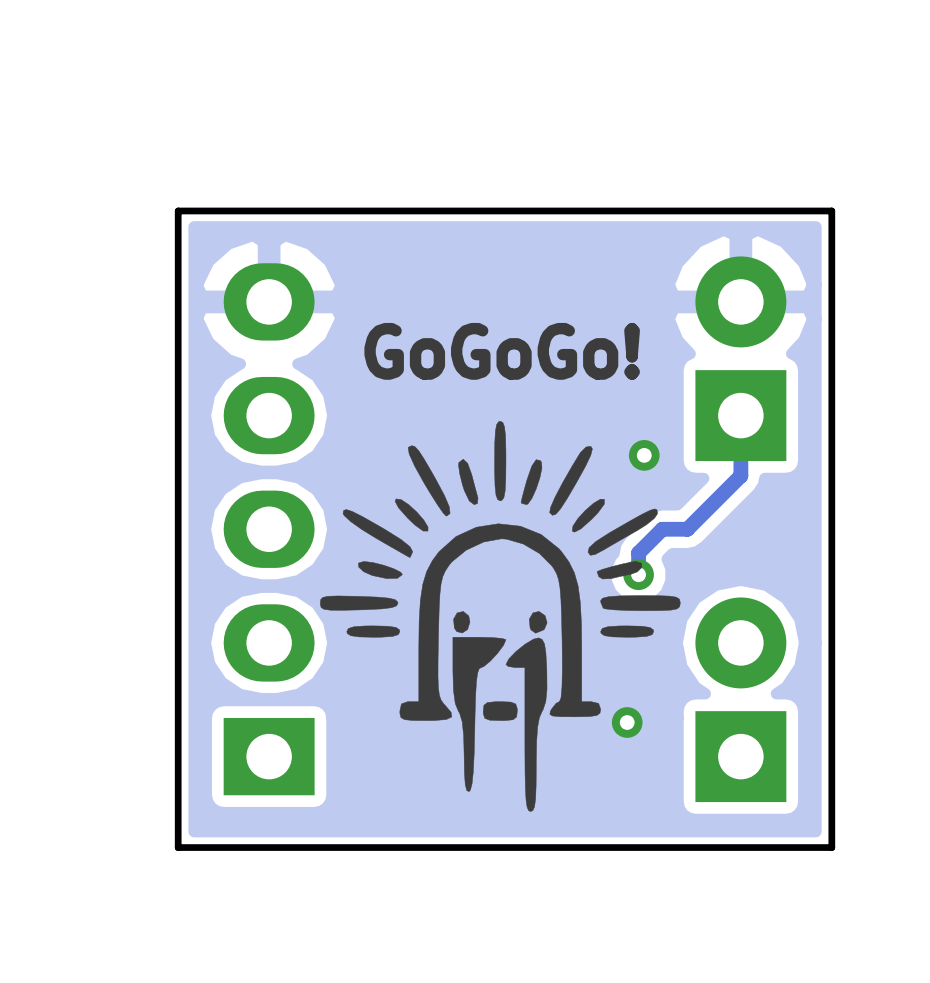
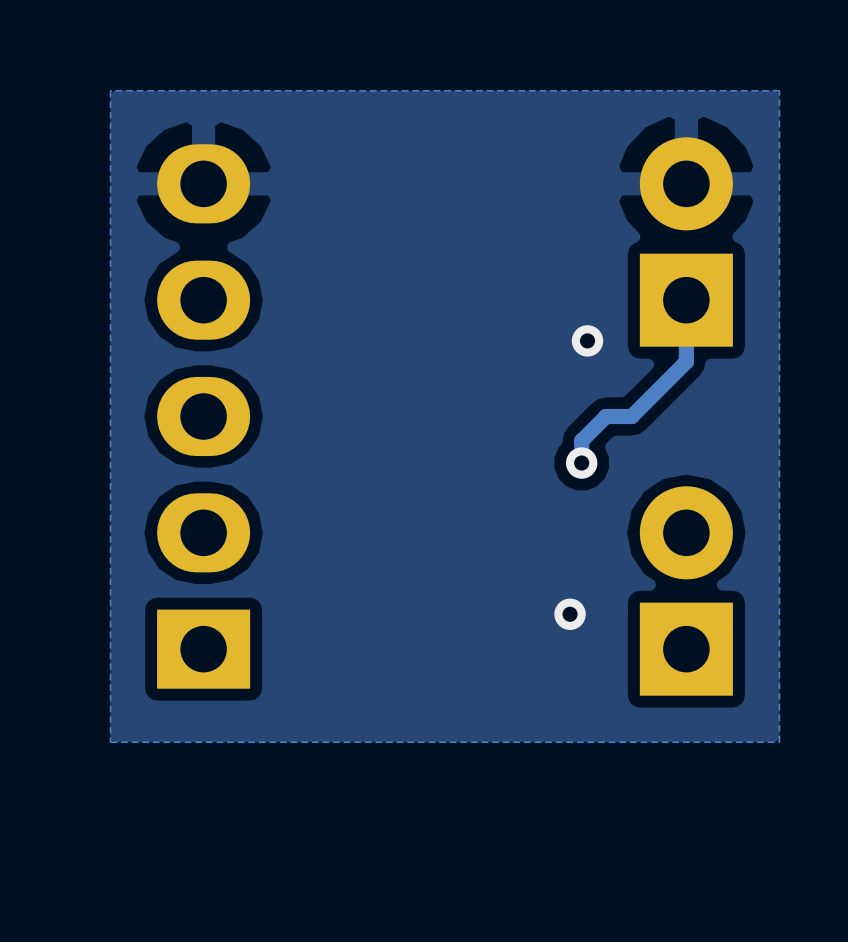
board edge: (831, 210) (831, 847) (178, 847) (178, 210) (831, 210) -> none
text: GoGoGo! (502, 351) -> none
drawing: [320, 421, 681, 812] -> none

